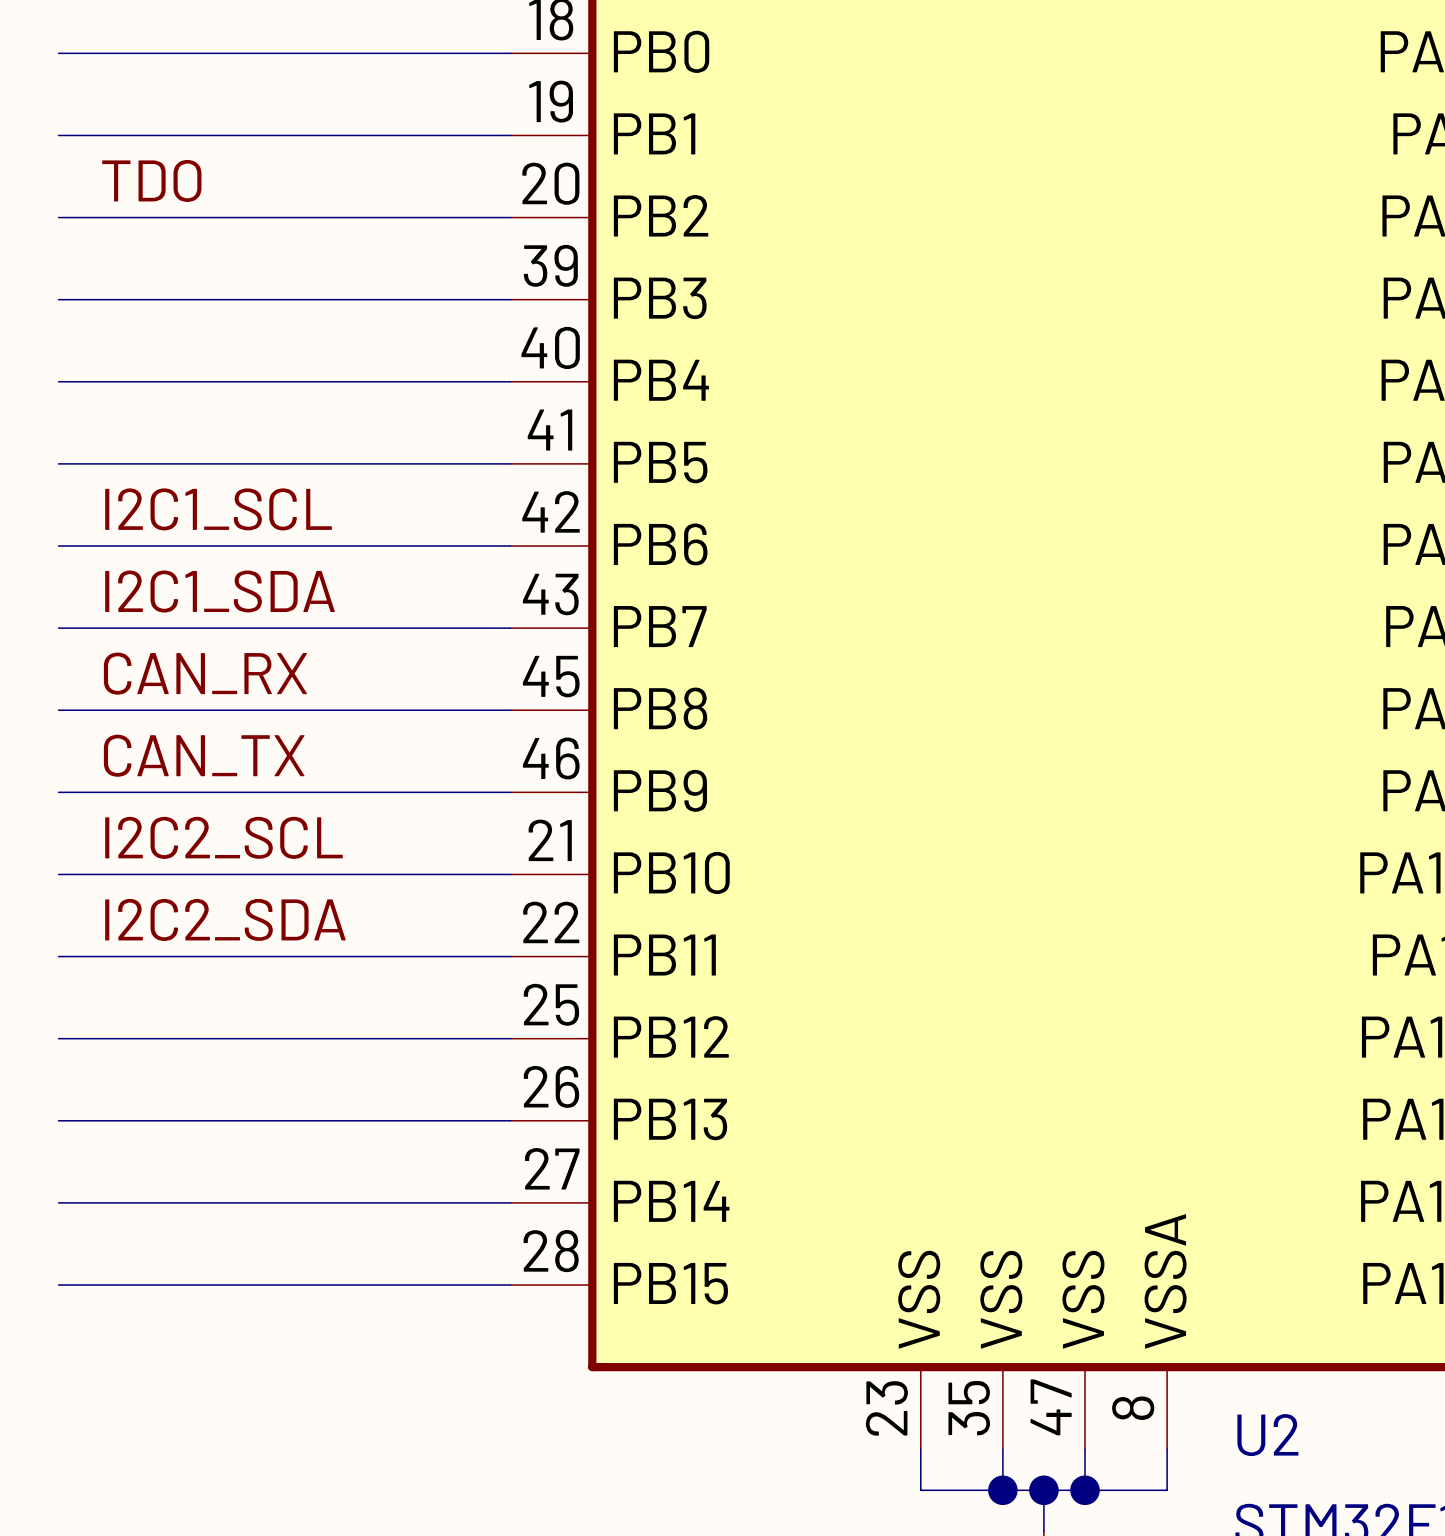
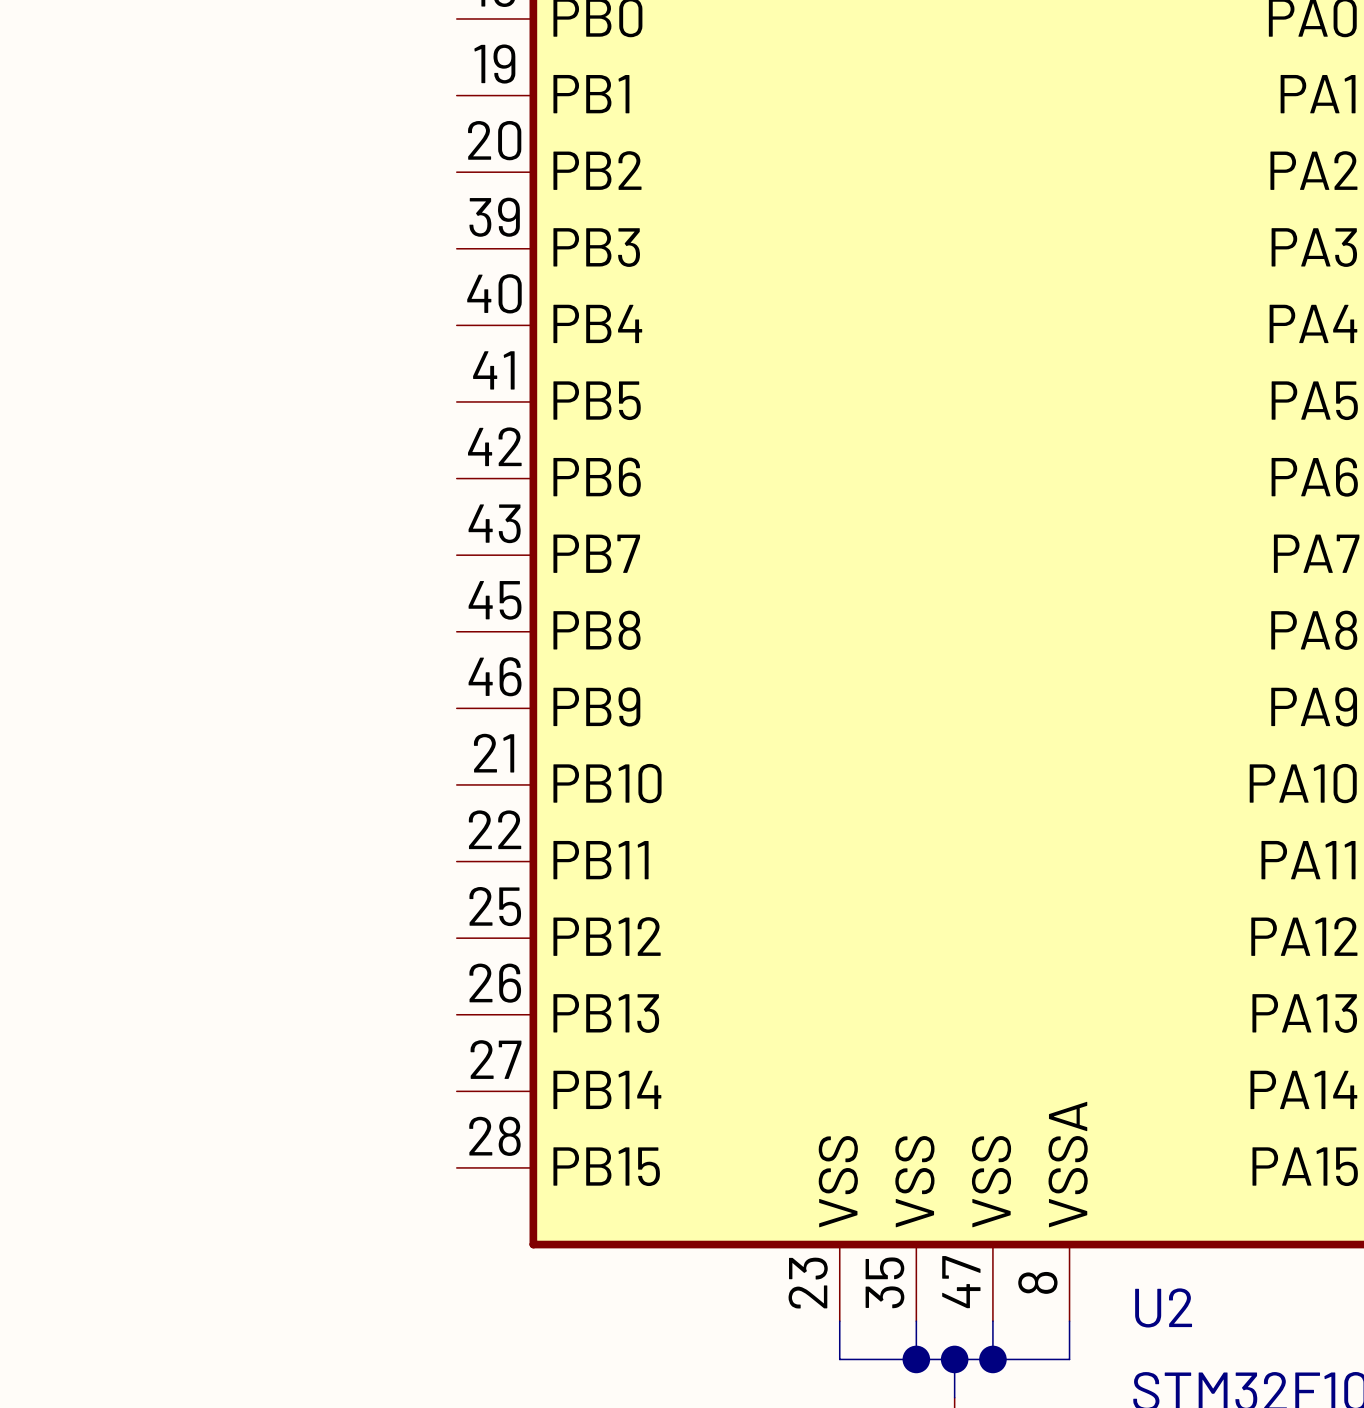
wire: (58, 53) (510, 53) -> none
wire: (58, 135) (510, 135) -> none
label: TDO (151, 180) -> none
wire: (58, 217) (510, 217) -> none
wire: (58, 299) (510, 299) -> none
wire: (58, 381) (510, 381) -> none
wire: (58, 463) (510, 463) -> none
label: I2C1_SCL (218, 509) -> none
wire: (58, 546) (510, 546) -> none
label: I2C1_SDA (220, 591) -> none
wire: (58, 628) (510, 628) -> none
label: CAN_RX (205, 673) -> none
wire: (58, 710) (510, 710) -> none
label: CAN_TX (204, 755) -> none
wire: (58, 792) (510, 792) -> none
label: I2C2_SCL (223, 837) -> none
wire: (58, 874) (510, 874) -> none
label: I2C2_SDA (225, 919) -> none
wire: (58, 956) (510, 956) -> none
wire: (58, 1038) (510, 1038) -> none
wire: (58, 1120) (510, 1120) -> none
wire: (58, 1202) (510, 1202) -> none
wire: (58, 1285) (510, 1285) -> none

